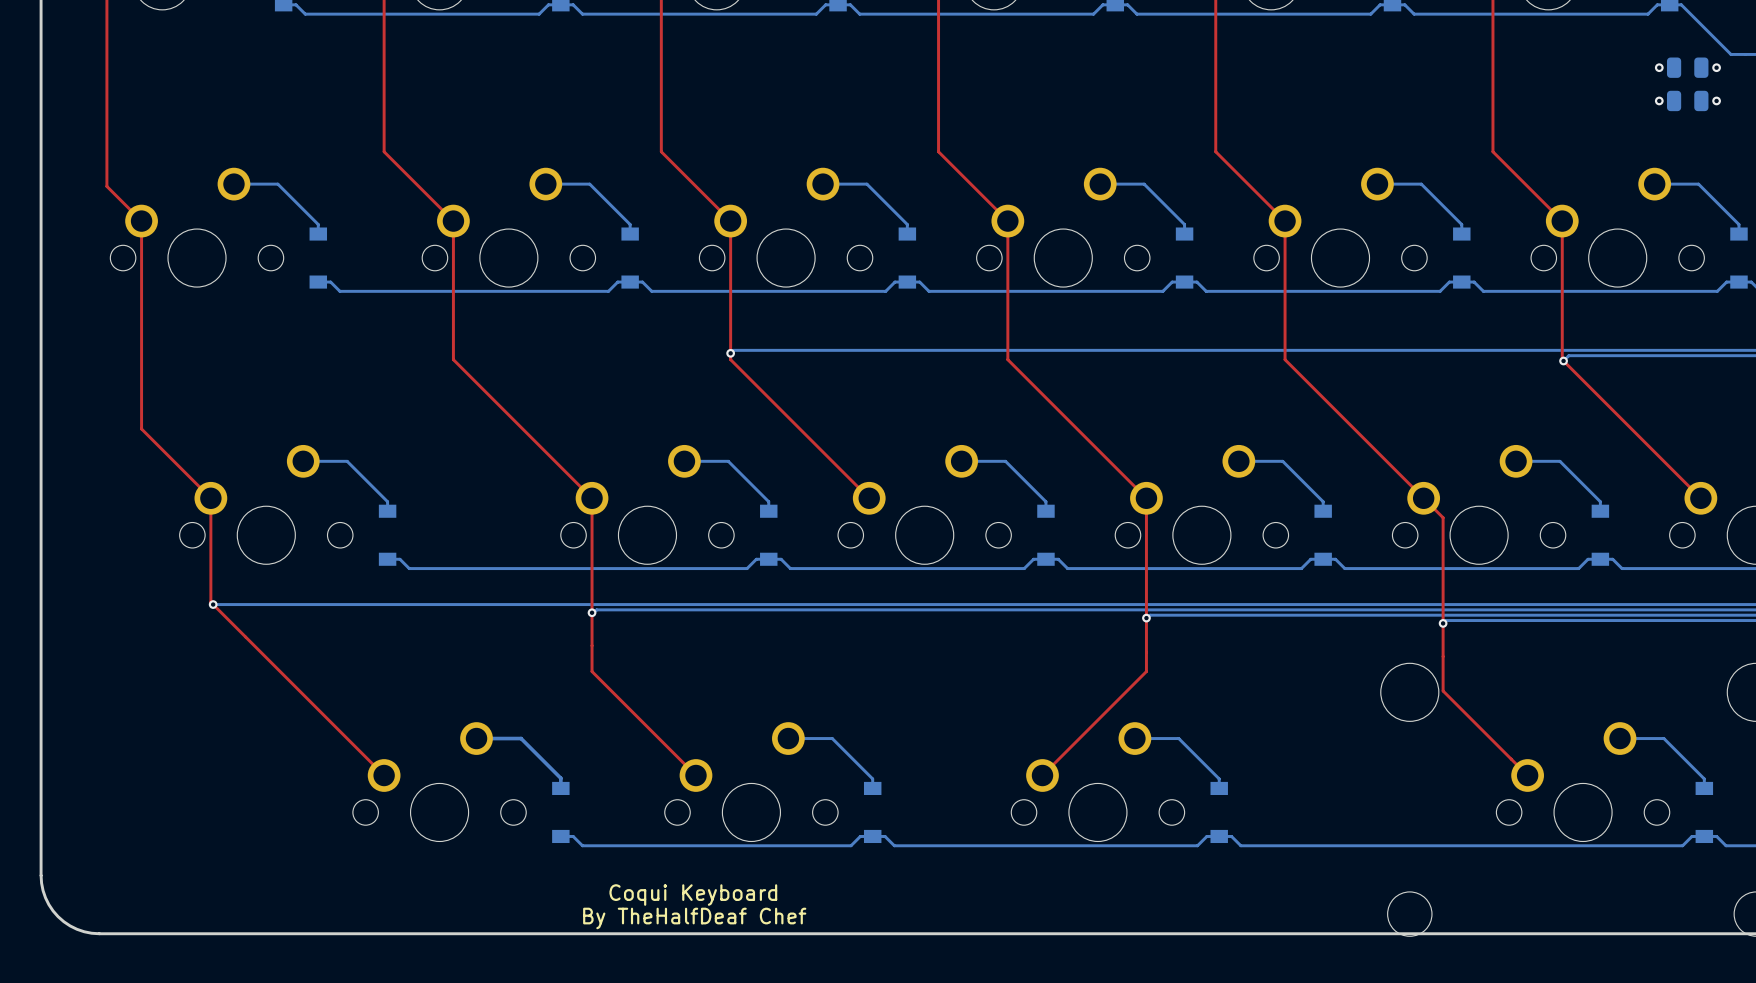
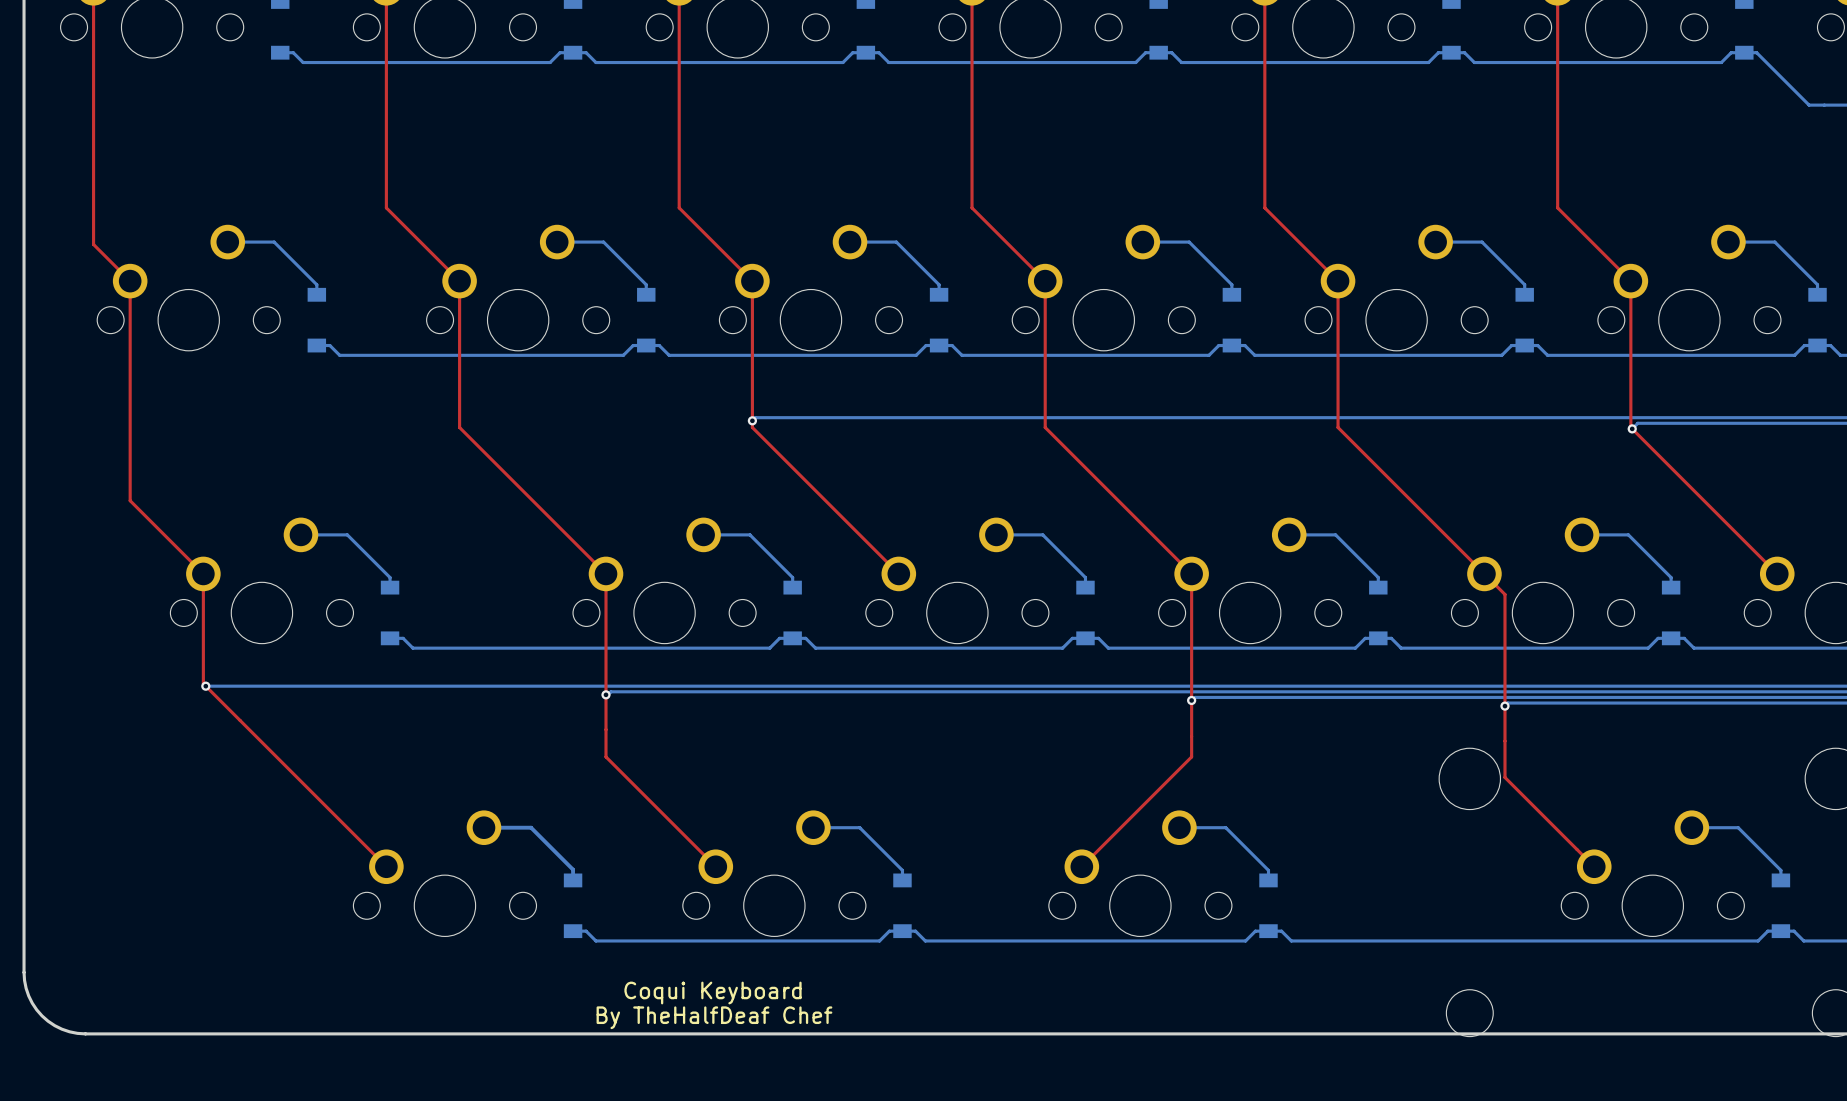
via: (1659, 67) -> none
part: (1687, 67) -> none
via: (1716, 67) -> none
via: (1659, 100) -> none
part: (1687, 100) -> none
via: (1716, 100) -> none

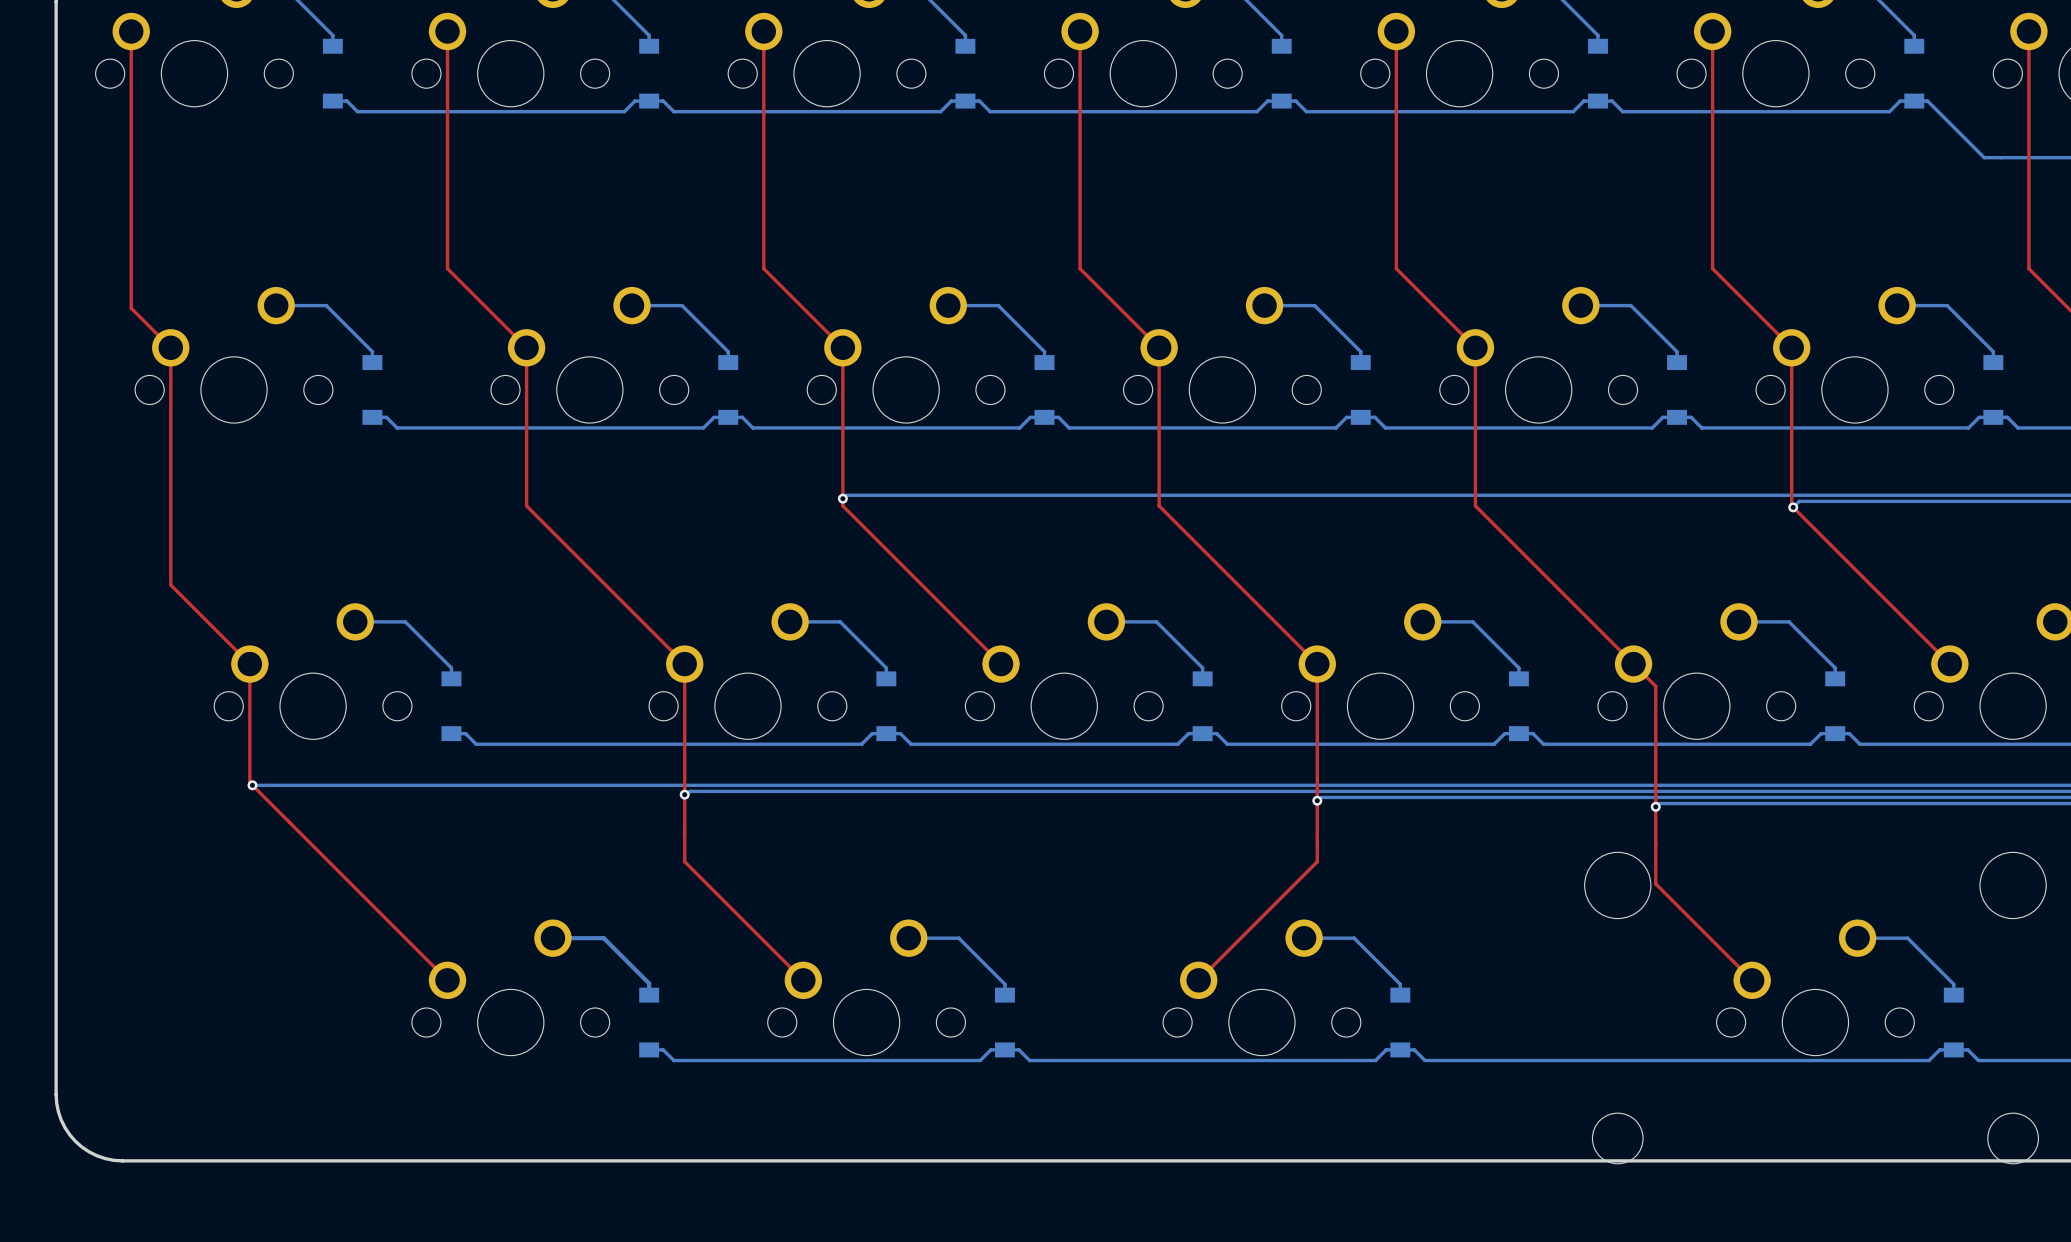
text: Coqui Keyboard (713, 993) -> none
text: By TheHalfDeaf Chef (714, 1017) -> none

